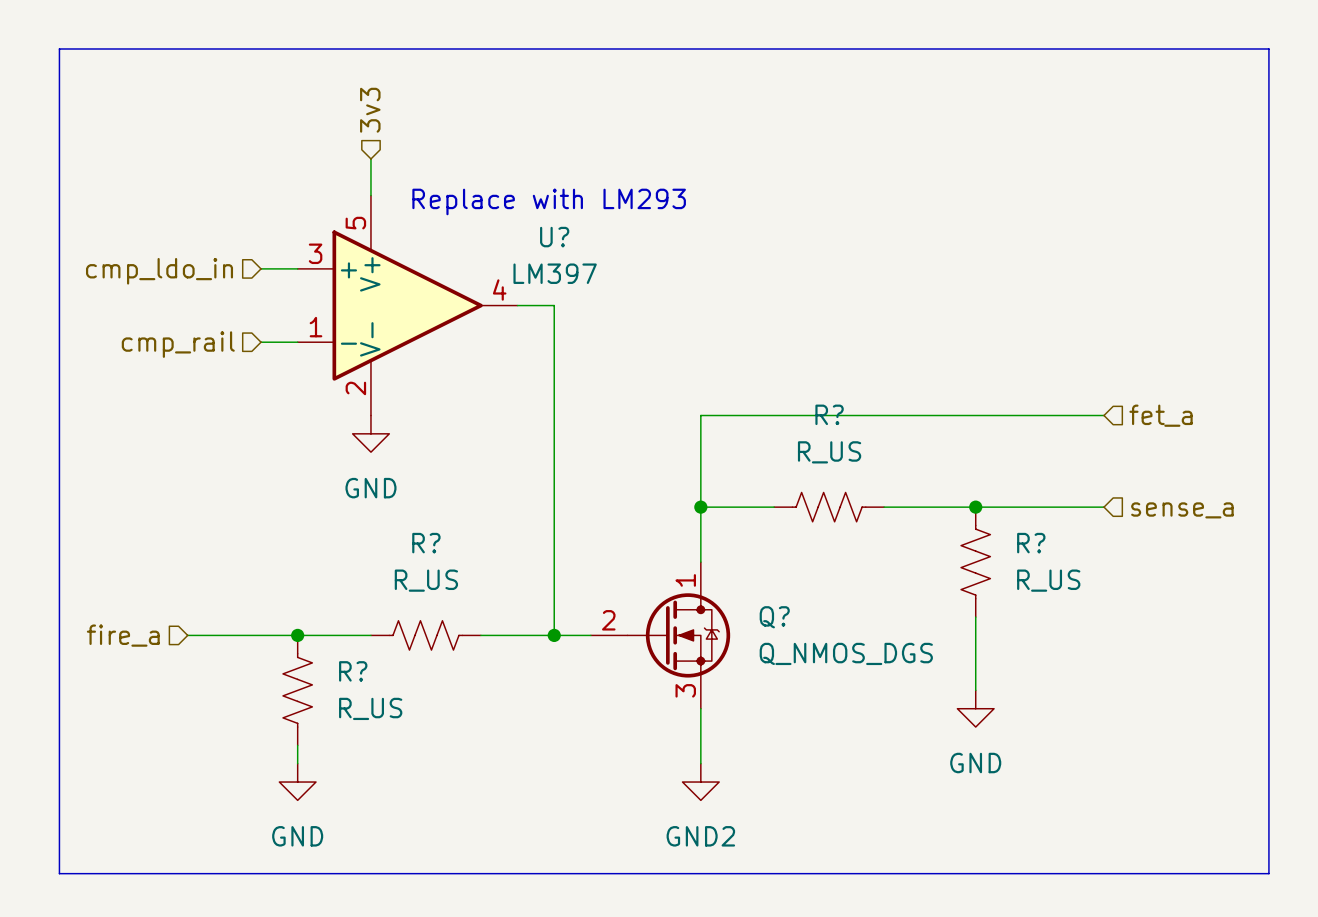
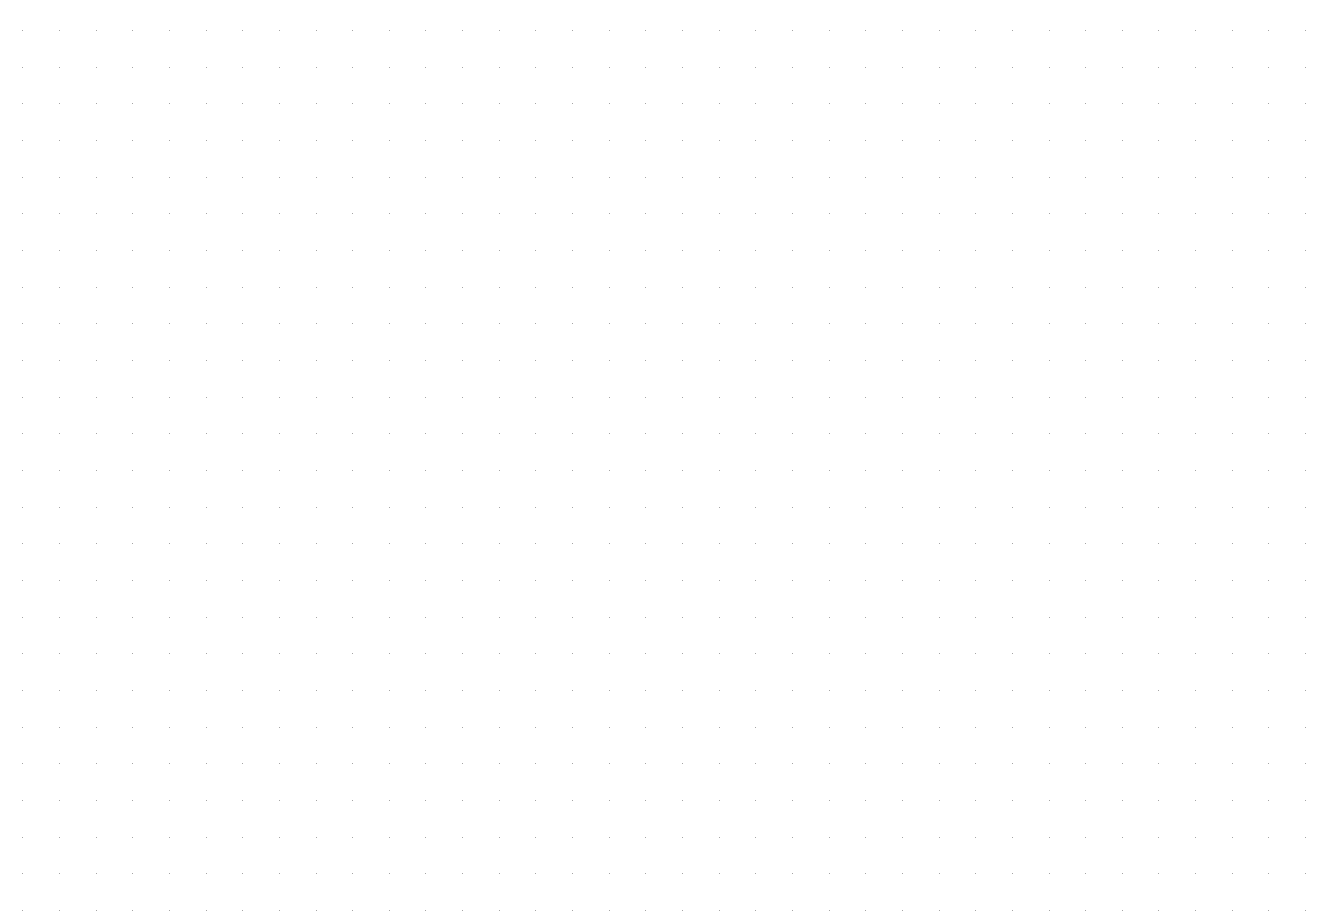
line: (59, 48) (1268, 48) (1268, 873) (59, 873) (59, 48) -> none
hierarchical label: 3v3 (370, 110) -> none
wire: (370, 158) (370, 195) -> none
text: Replace with LM293 (549, 201) -> none
wire: (261, 268) (297, 268) -> none
hierarchical label: cmp_ldo_in (159, 271) -> none
U?: LM397 (407, 305) -> none
wire: (517, 305) (554, 305) (554, 635) -> none
wire: (261, 342) (297, 342) -> none
hierarchical label: cmp_rail (178, 344) -> none
wire: (1104, 415) (700, 415) (700, 562) -> none
hierarchical label: fet_a (1161, 415) -> none
power symbol: GND (370, 433) -> none
wire: (700, 507) (774, 507) -> none
junction: (700, 507) -> none
R?: R_US (829, 507) -> none
wire: (884, 507) (1104, 507) -> none
junction: (975, 507) -> none
hierarchical label: sense_a (1182, 510) -> none
R?: R_US (975, 562) -> none
wire: (975, 617) (975, 690) -> none
hierarchical label: fire_a (123, 635) -> none
wire: (187, 635) (370, 635) -> none
junction: (297, 635) -> none
R?: R_US (425, 635) -> none
wire: (480, 635) (590, 635) -> none
junction: (554, 635) -> none
Q?: Q_NMOS_DGS (660, 635) -> none
R?: R_US (297, 690) -> none
wire: (700, 708) (700, 763) -> none
power symbol: GND (975, 708) -> none
wire: (297, 745) (297, 763) -> none
power symbol: GND (297, 782) -> none
power symbol: GND2 (700, 782) -> none

